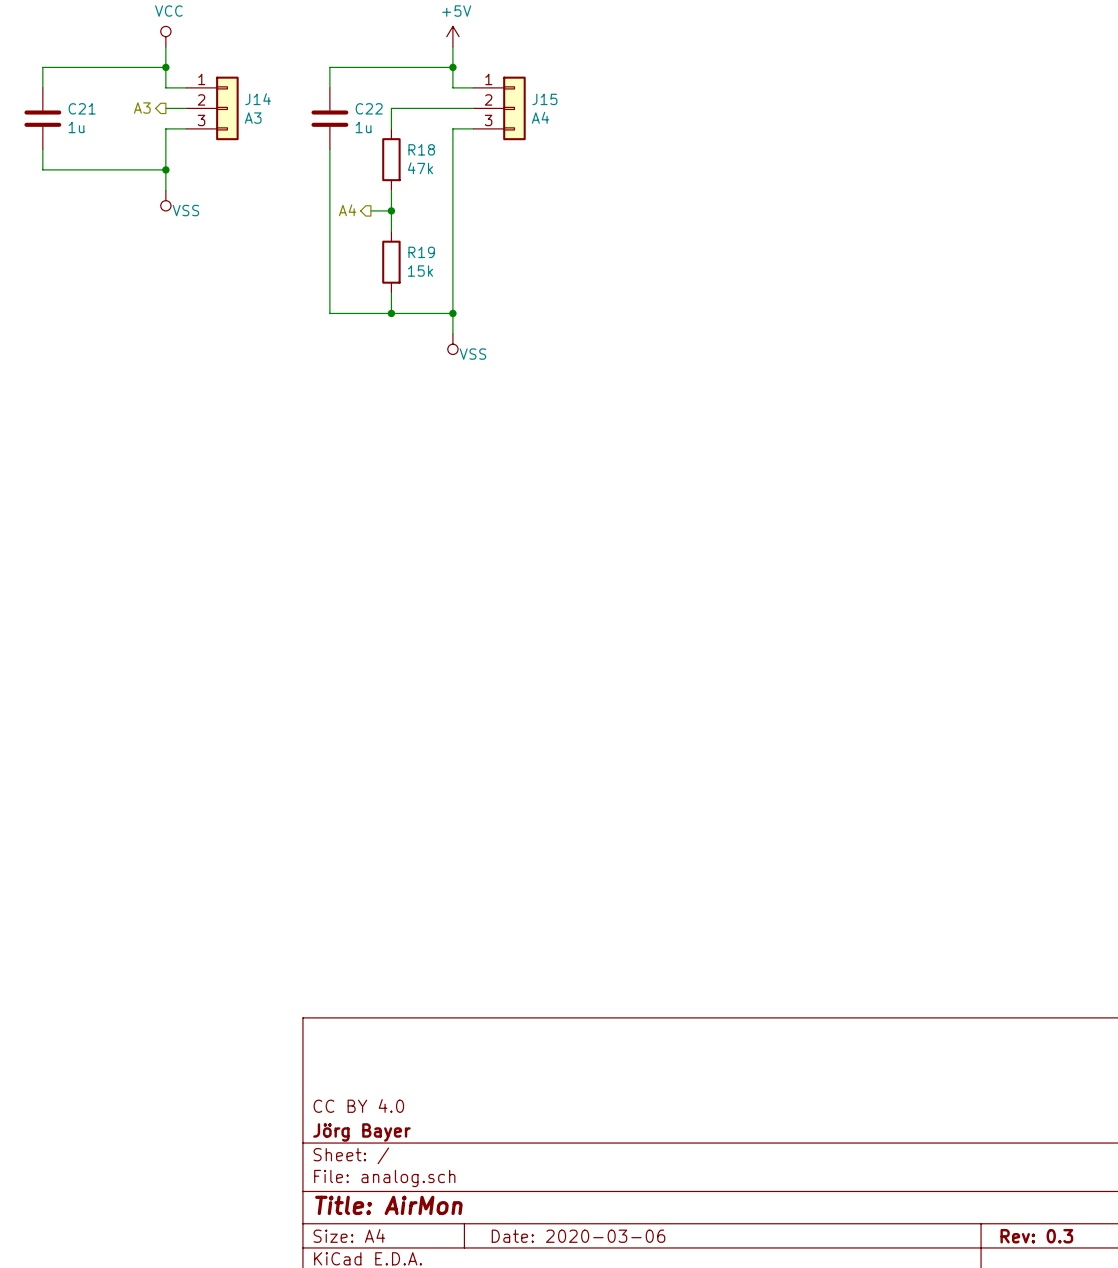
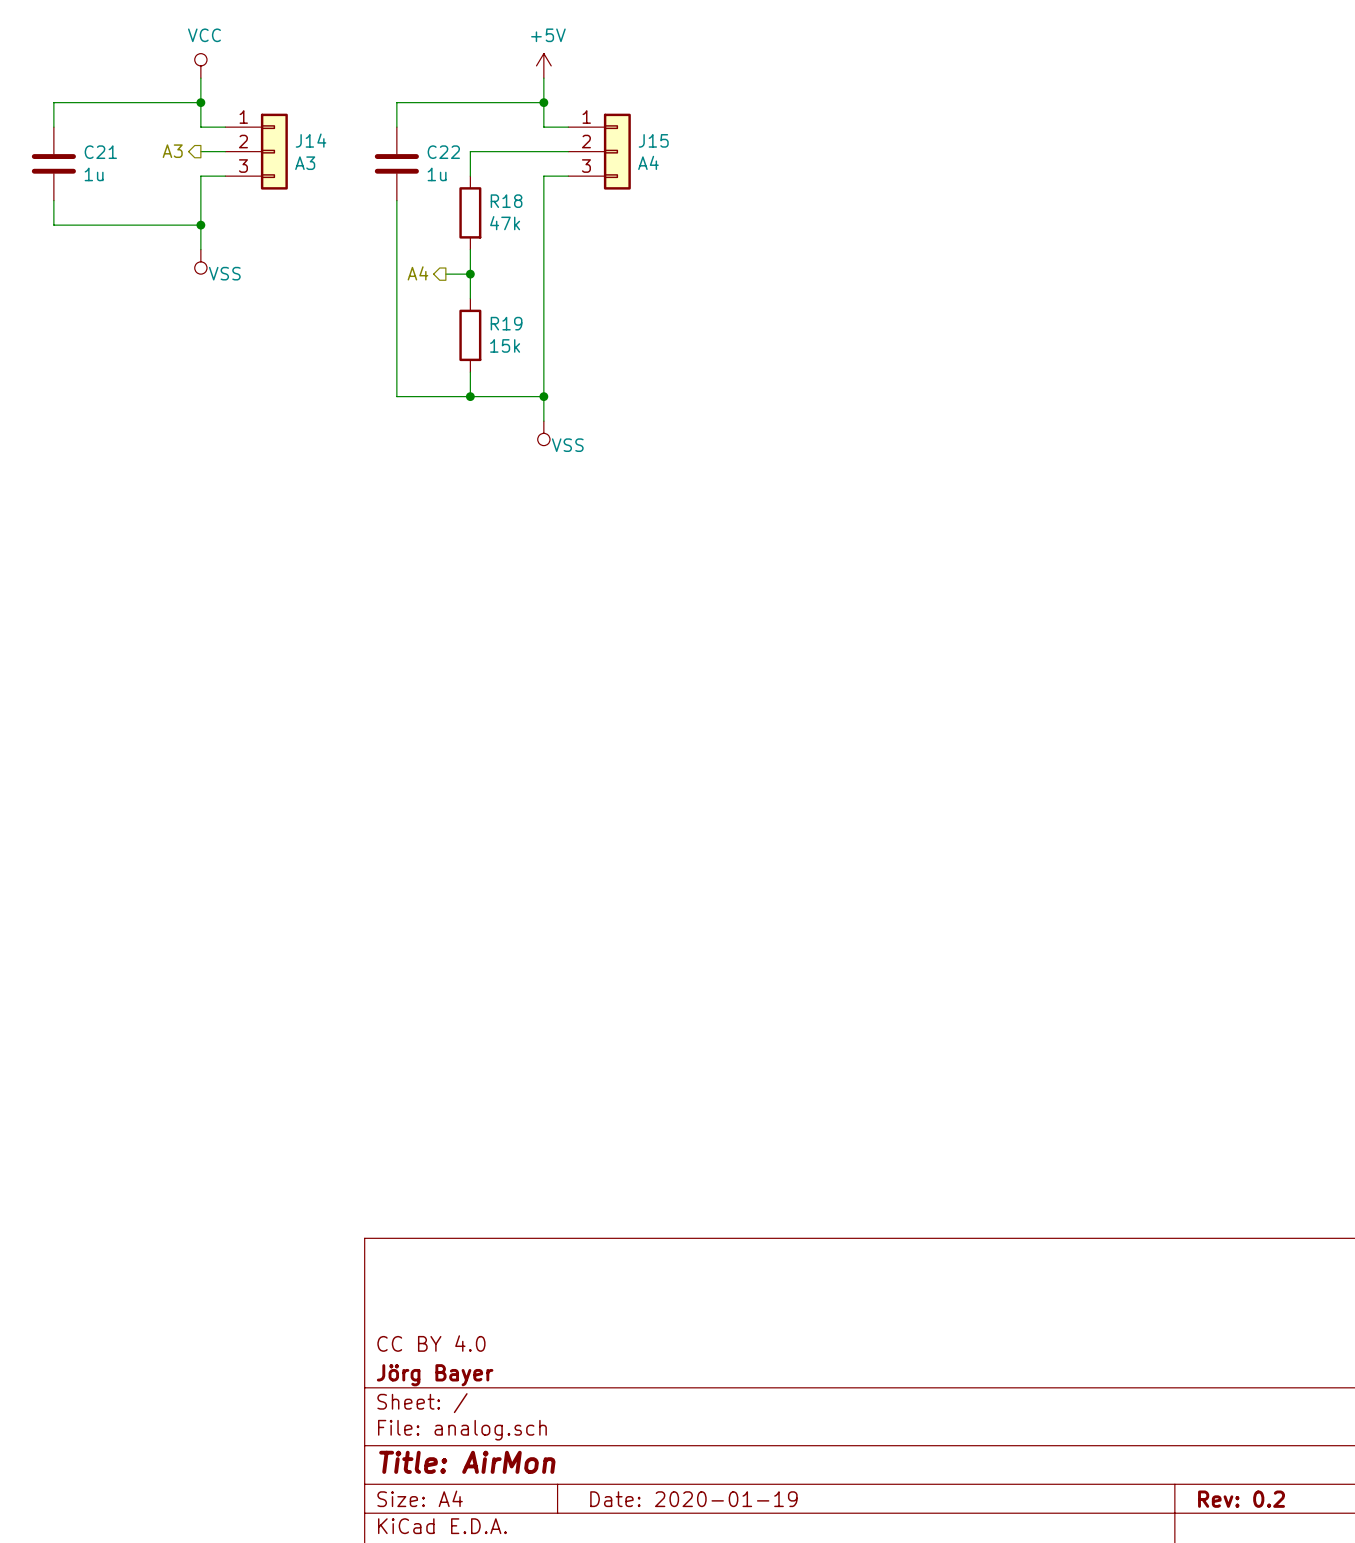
title block: Date: 2020-03-06 (578, 1236) -> Date: 2020-01-19 (693, 1499)
title block: Rev: 0.3 (1036, 1236) -> Rev: 0.2 (1241, 1499)

